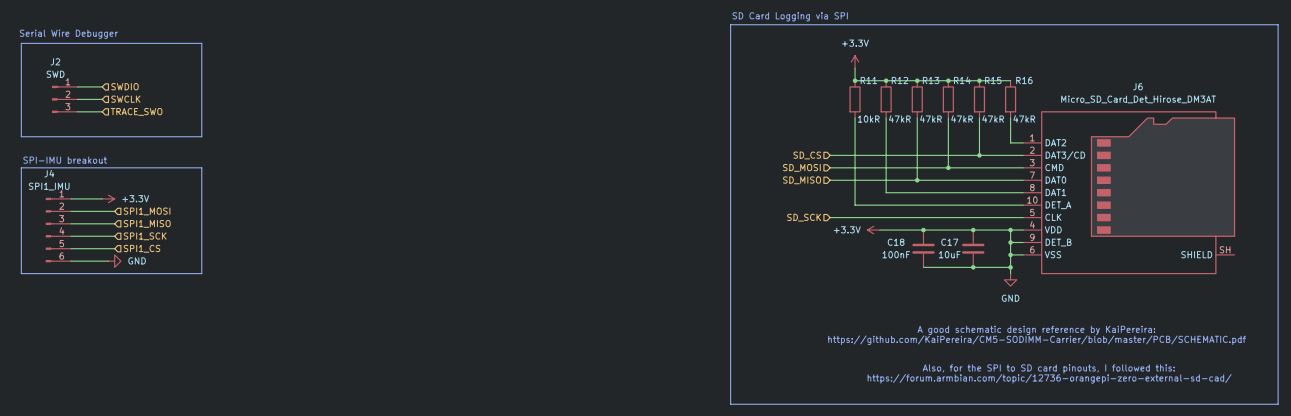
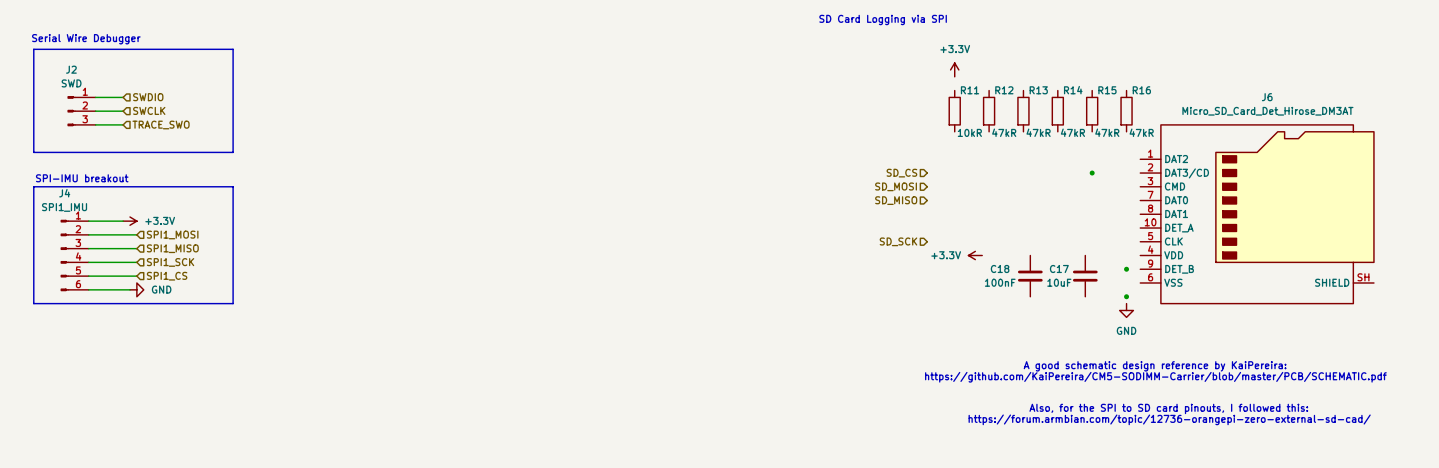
line: (730, 24) (1278, 24) (1278, 404) (730, 404) (730, 24) -> none
wire: (855, 68) (855, 80) (1010, 80) -> none
junction: (855, 80) -> none
junction: (886, 80) -> none
junction: (917, 80) -> none
junction: (948, 80) -> none
junction: (979, 80) -> none
wire: (855, 118) (855, 205) (1023, 205) -> none
wire: (886, 118) (886, 192) (1023, 192) -> none
wire: (917, 118) (917, 180) -> none
wire: (948, 118) (948, 167) -> none
wire: (979, 118) (979, 155) -> none
wire: (1010, 118) (1010, 142) (1023, 142) -> none
wire: (830, 155) (1023, 155) -> none
wire: (830, 167) (1023, 167) -> none
junction: (948, 167) -> none
wire: (830, 180) (1023, 180) -> none
junction: (917, 180) -> none
wire: (830, 217) (1023, 217) -> none
wire: (879, 230) (1023, 230) -> none
junction: (923, 230) -> none
junction: (973, 230) -> none
wire: (1010, 230) (1010, 273) -> none
junction: (1010, 230) -> none
wire: (1010, 242) (1023, 242) -> none
wire: (1010, 254) (1023, 254) -> none
junction: (1010, 254) -> none
wire: (923, 267) (1010, 267) -> none
junction: (973, 267) -> none

